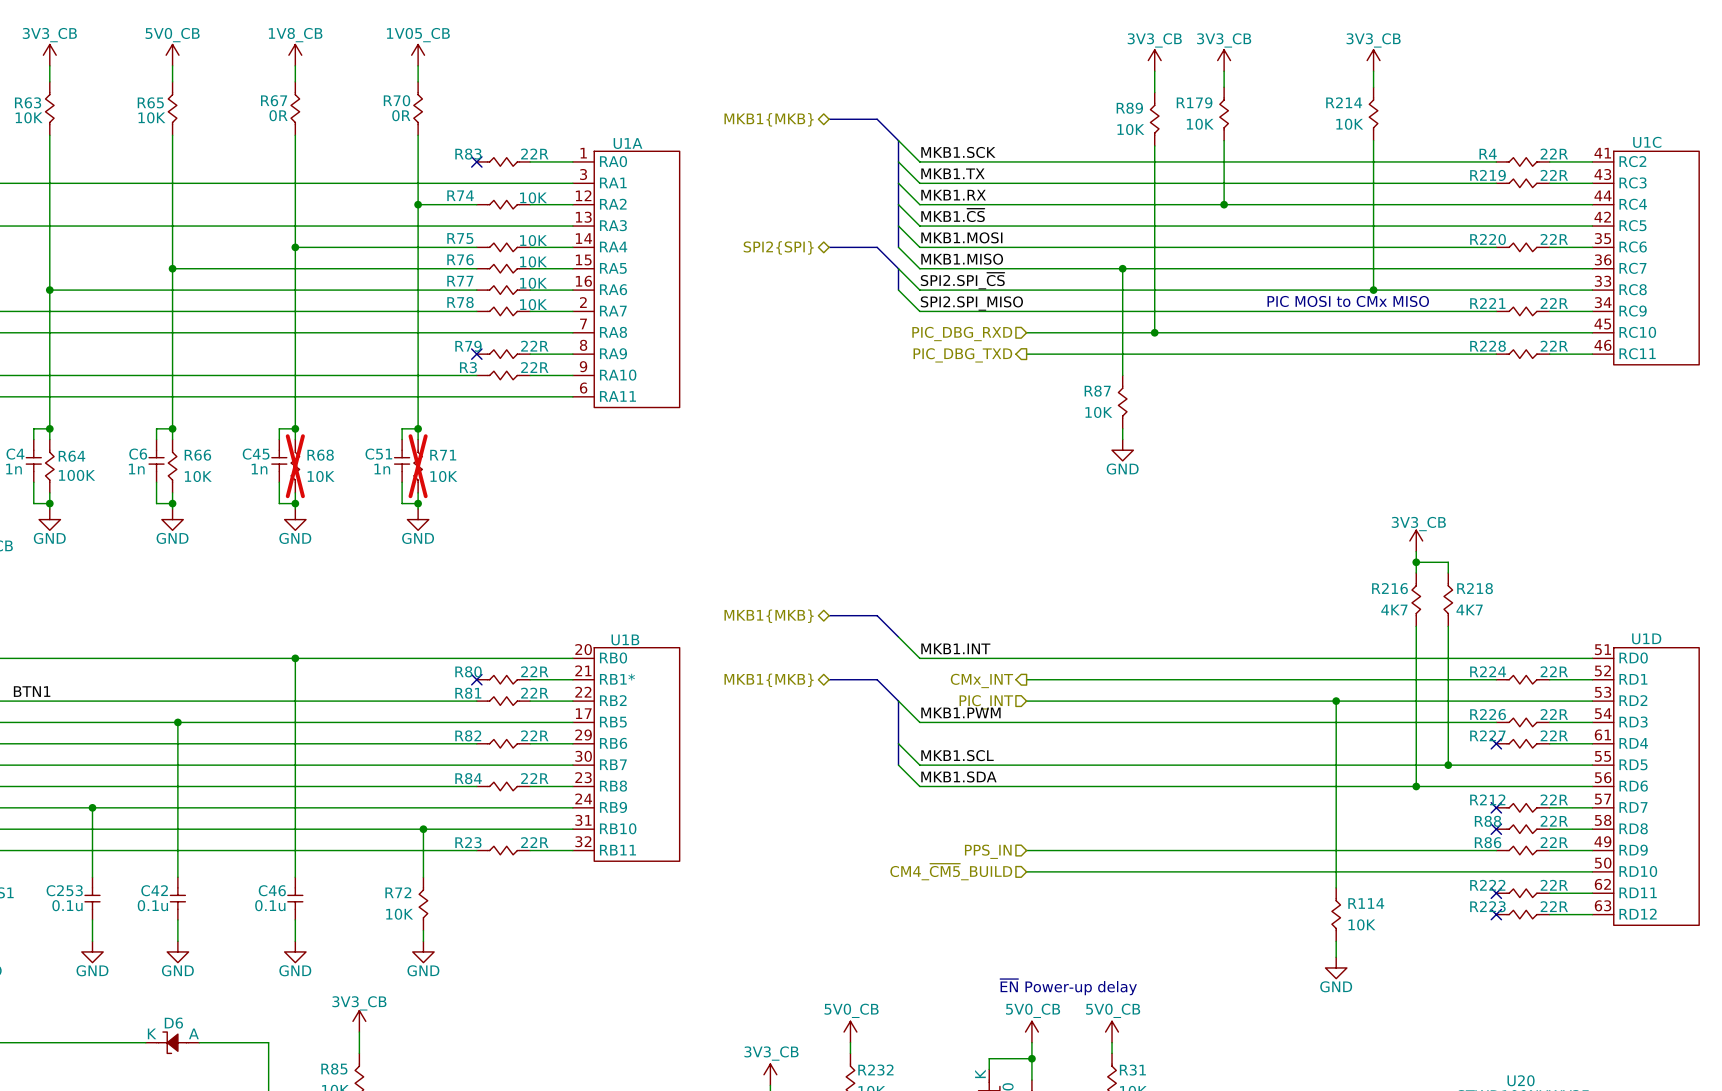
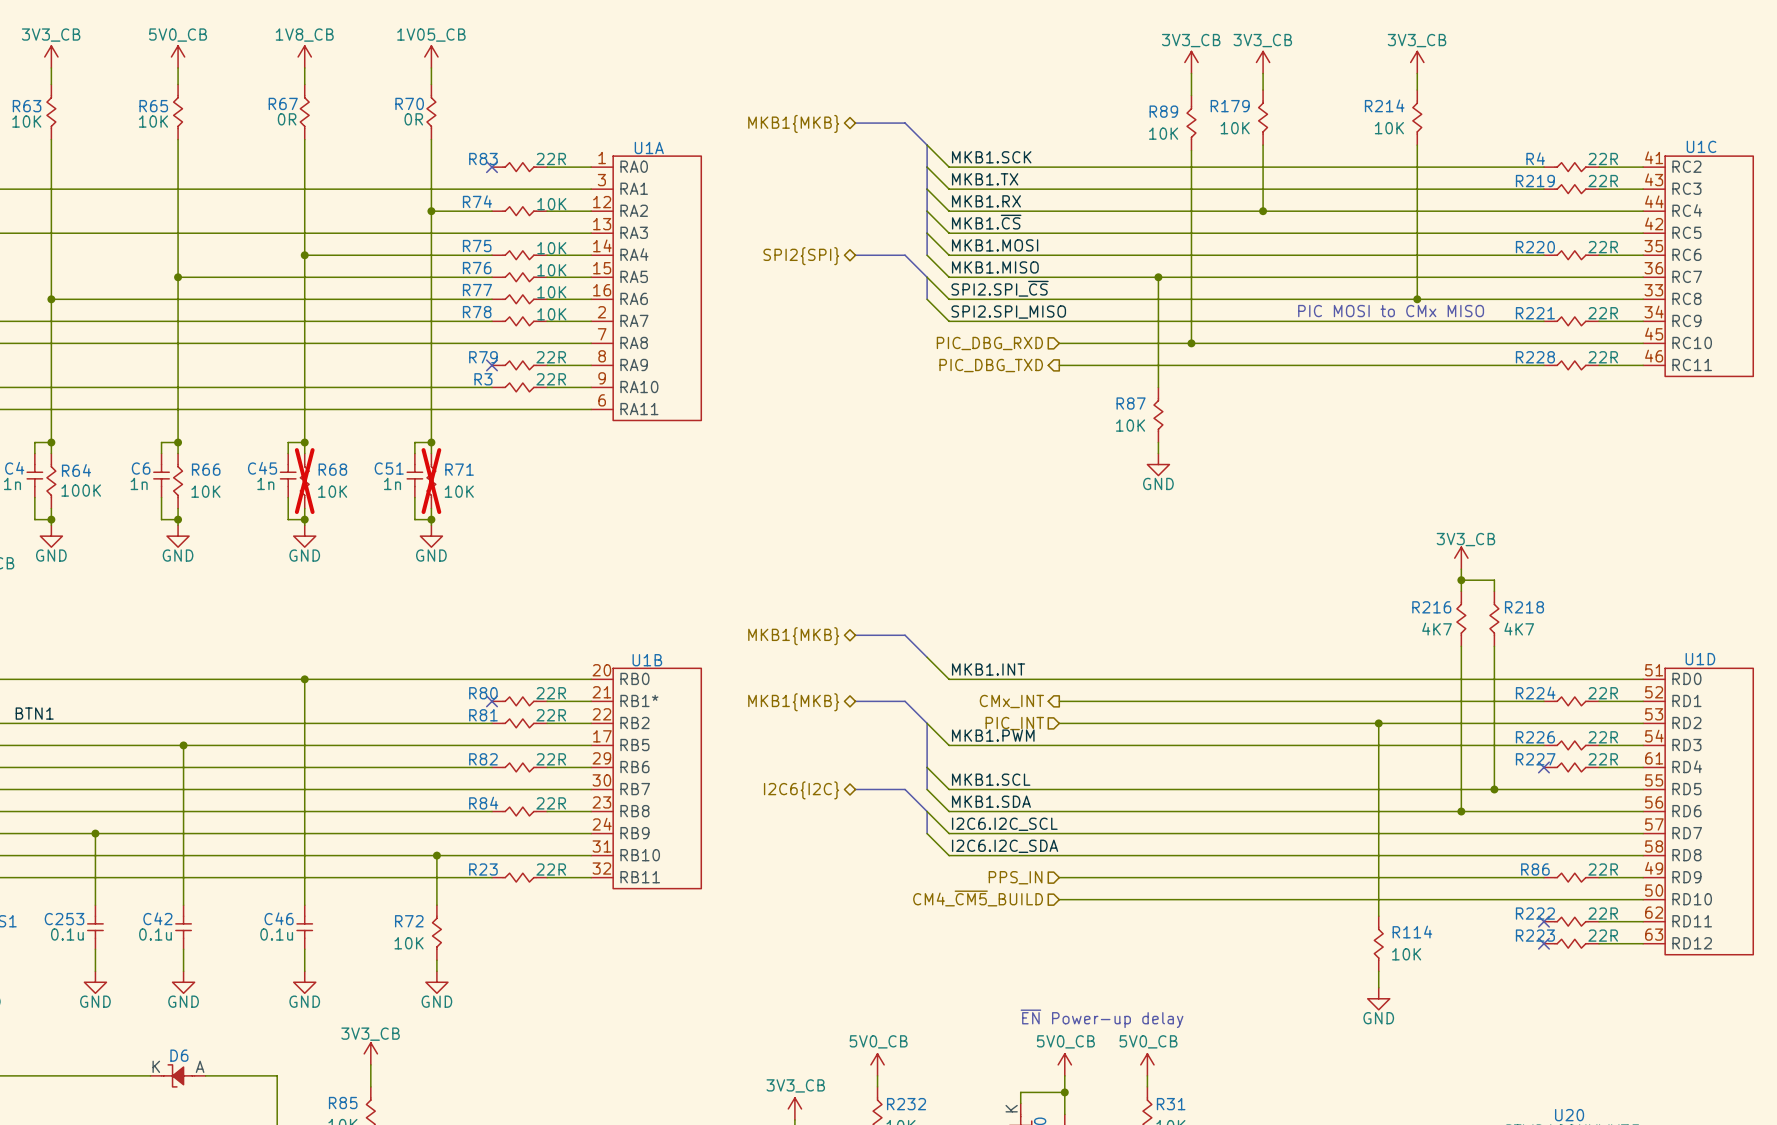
hierarchical label: none -> I2C6{I2C} (801, 790)
bus: none -> (855, 789) (905, 789) (927, 811) (927, 833)
wire: none -> (927, 811) (949, 833)
label: none -> I2C6.I2C_SCL (1004, 824)
wire: none -> (927, 833) (949, 855)
wire: none -> (949, 833) (1599, 833)
no-connect mark: (1496, 807) -> none
R212: 22R (1523, 807) -> none
label: none -> I2C6.I2C_SDA (1005, 846)
wire: none -> (949, 855) (1599, 855)
no-connect mark: (1496, 829) -> none
R88: 22R (1523, 829) -> none

